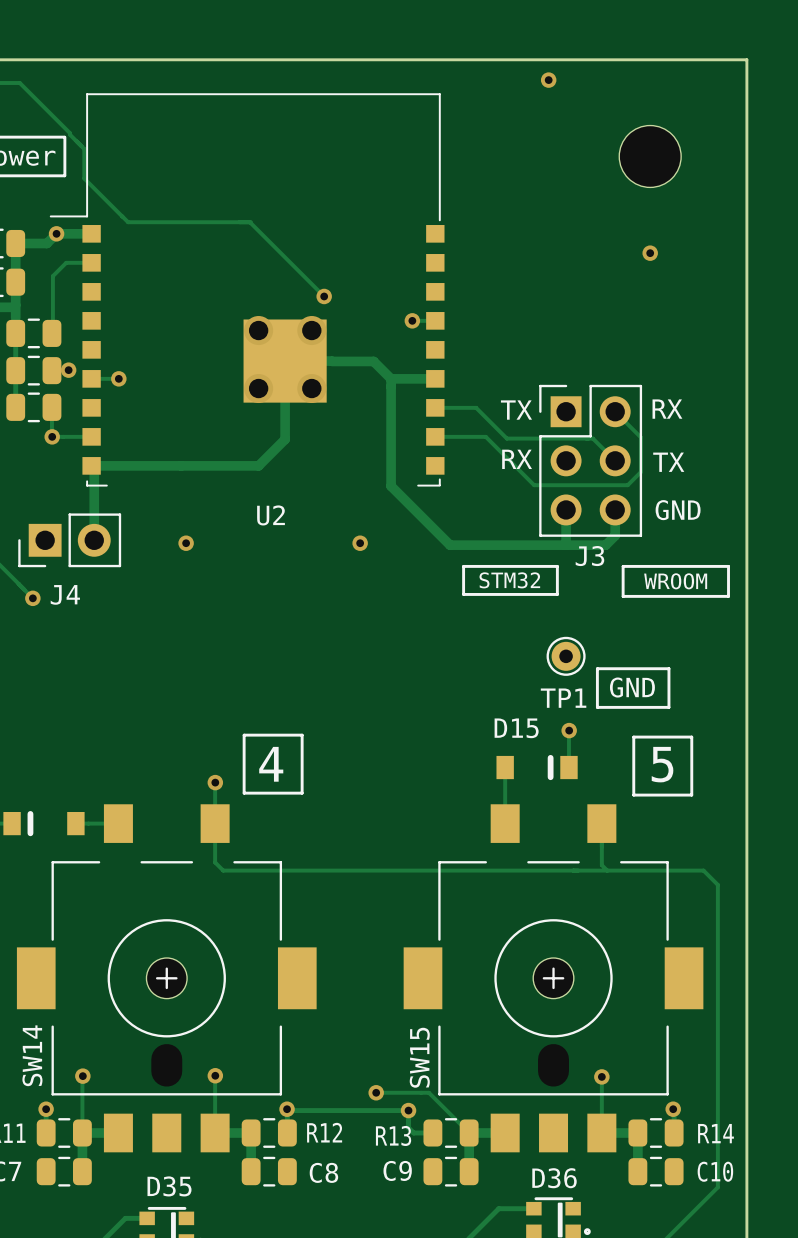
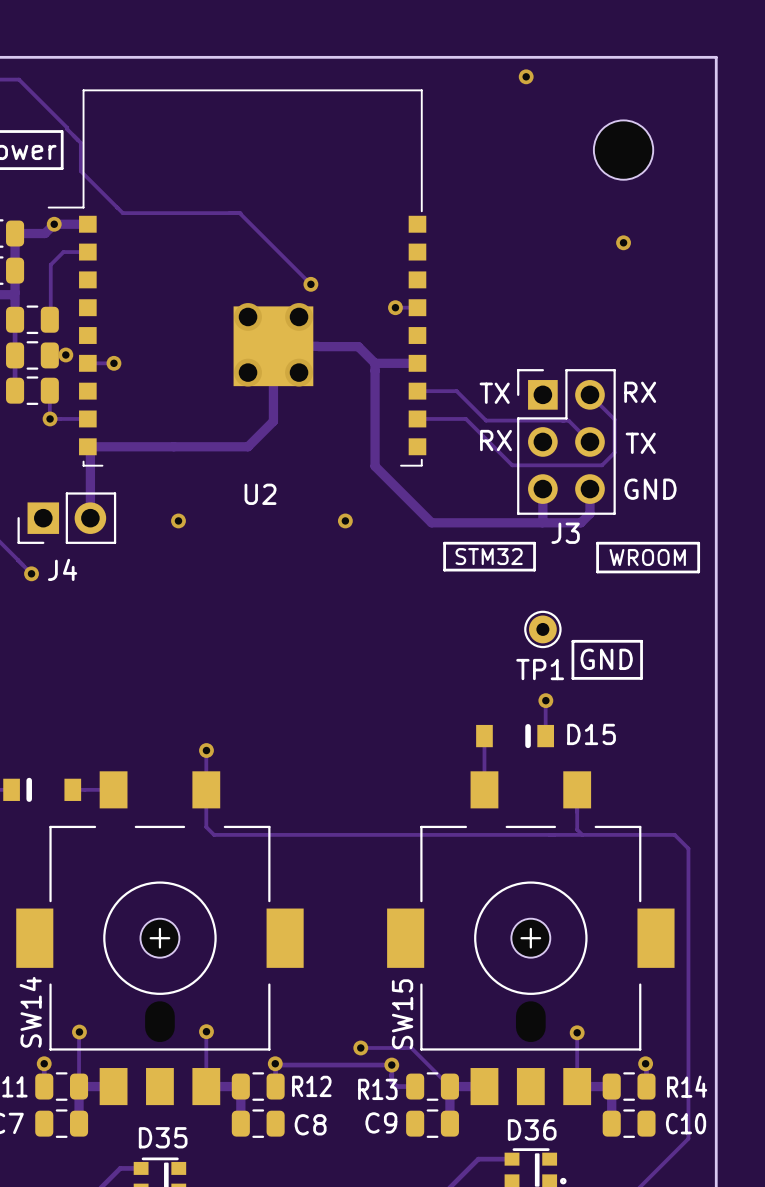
D15 name position: D15 (516, 728) -> D15 (591, 734)
line: (244, 735) (302, 735) (302, 793) (244, 793) (244, 735) -> none
line: (633, 737) (691, 737) (691, 795) (633, 795) (633, 737) -> none
text: 4 (271, 764) -> none
text: 5 (662, 764) -> none

